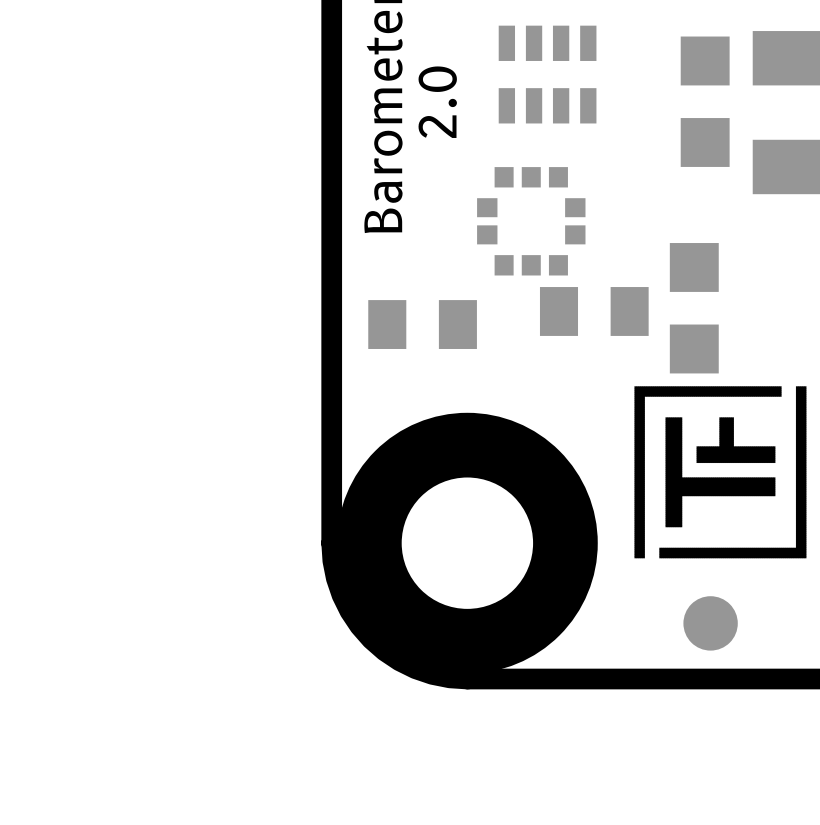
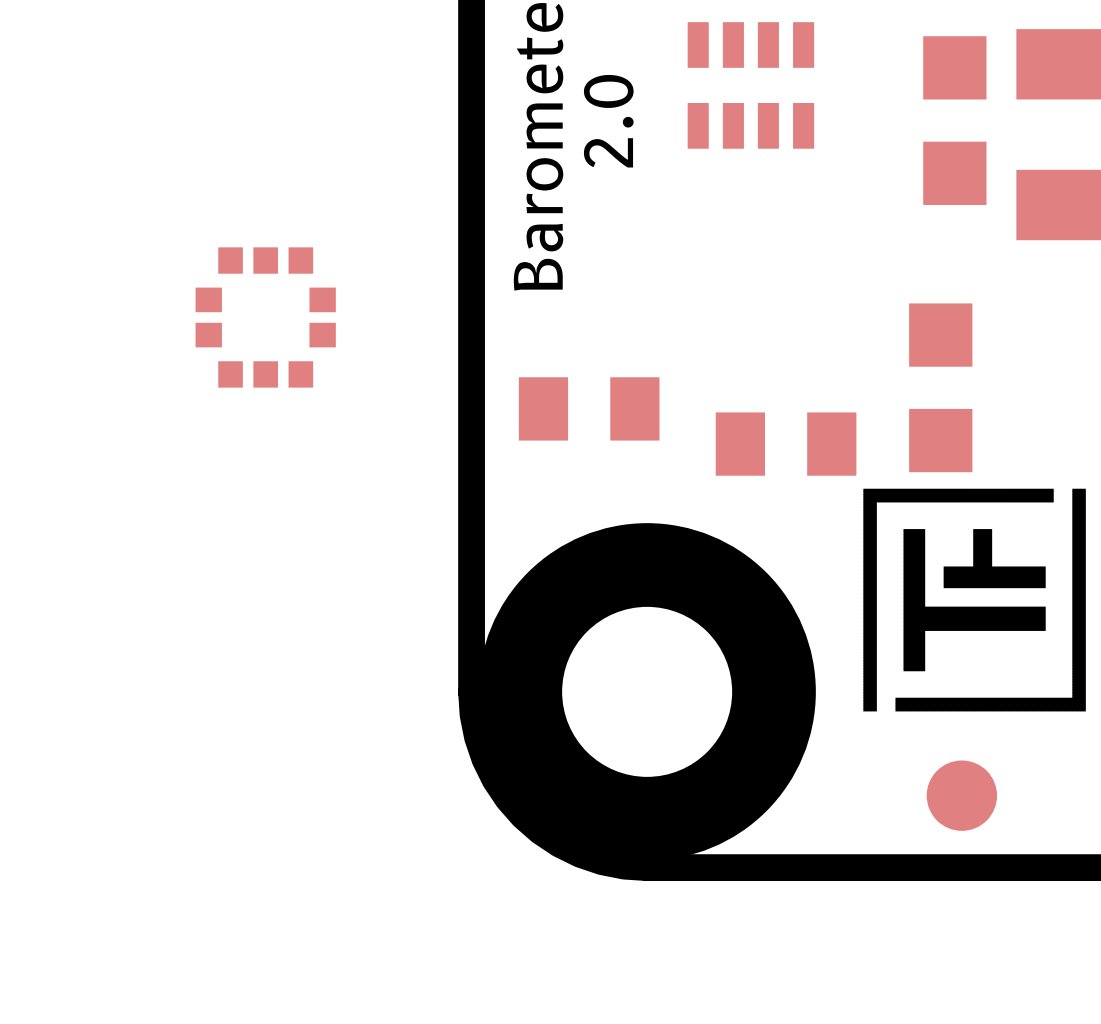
part position: (531, 221) -> (265, 317)
part position: (594, 311) -> (786, 444)

